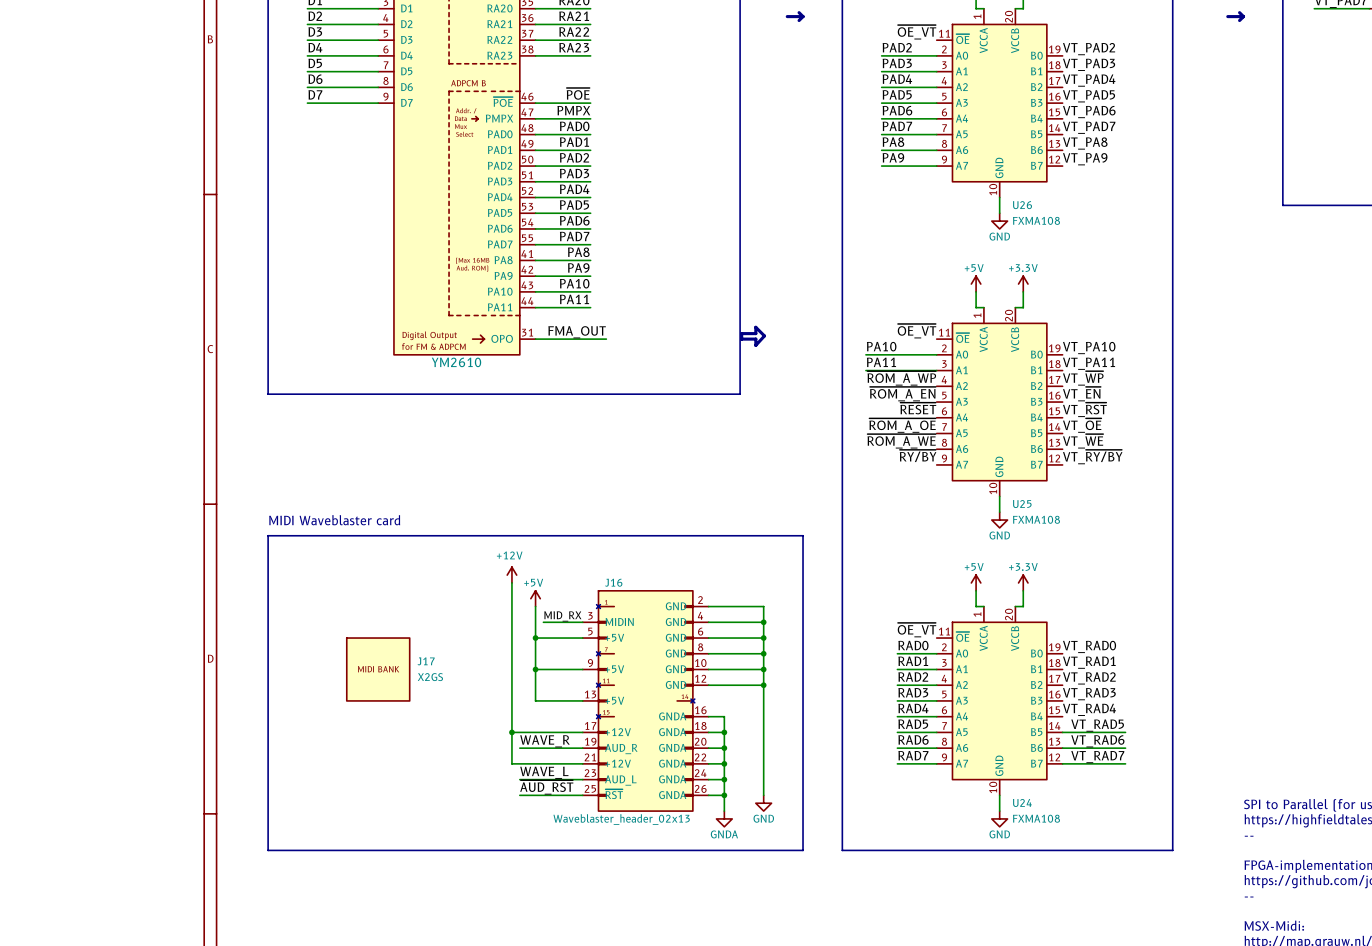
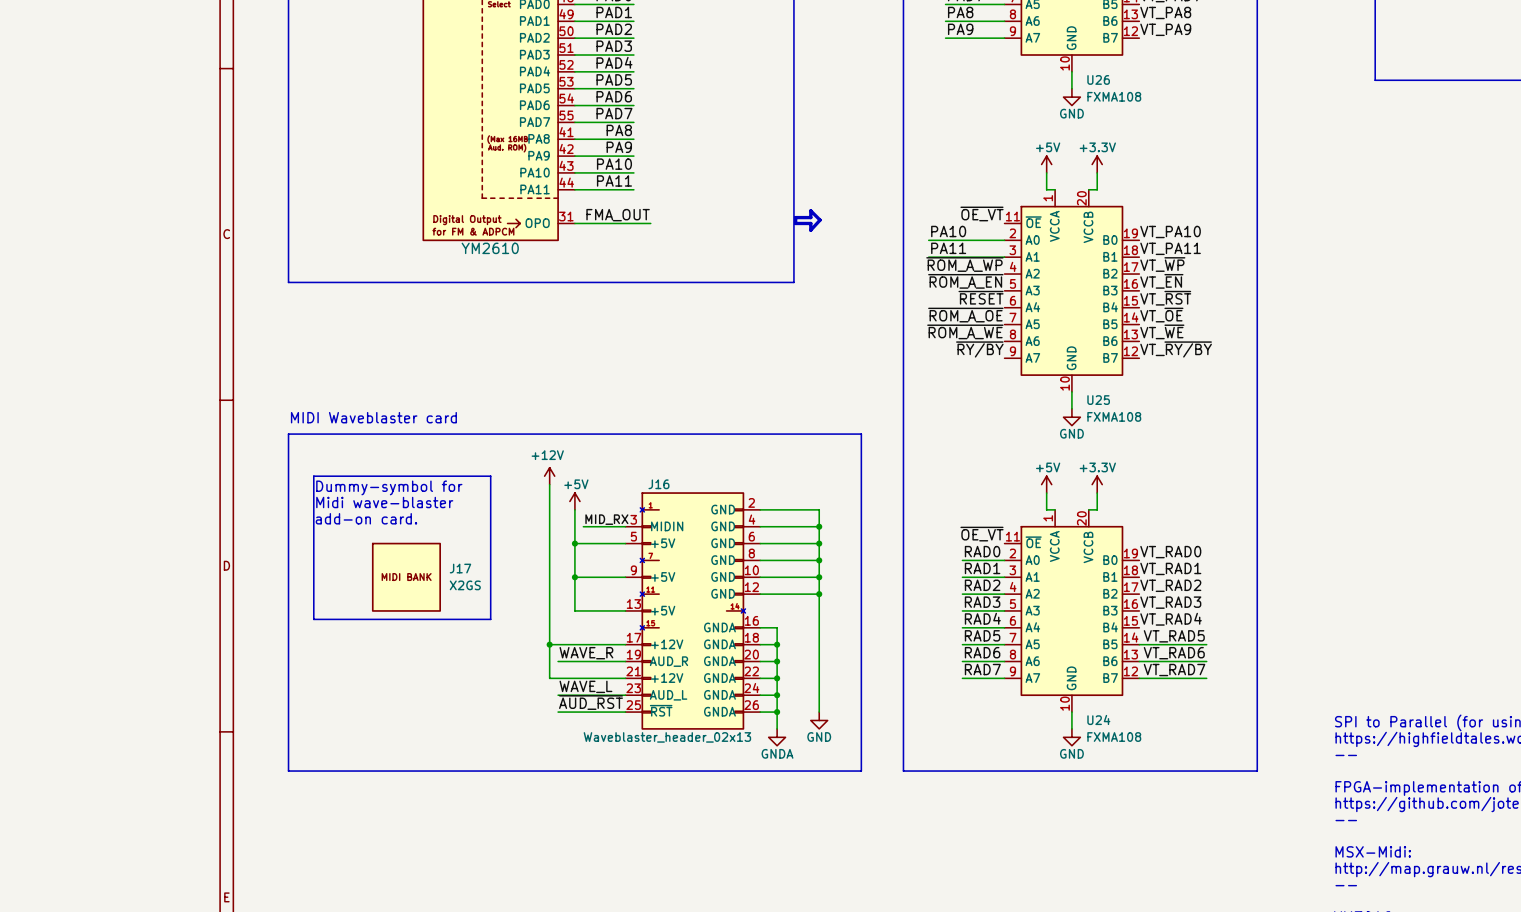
line: none -> (313, 476) (313, 619) (490, 619) (490, 476) (313, 476)
text: none -> Dummy-symbol for (389, 487)
text: none -> Midi wave-blaster (384, 502)
text: none -> add-on card. (366, 518)

